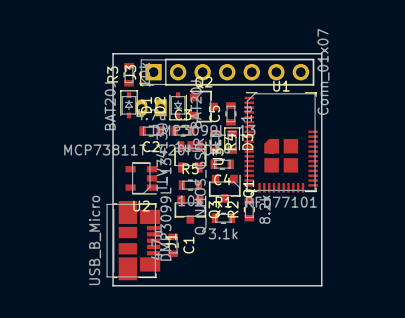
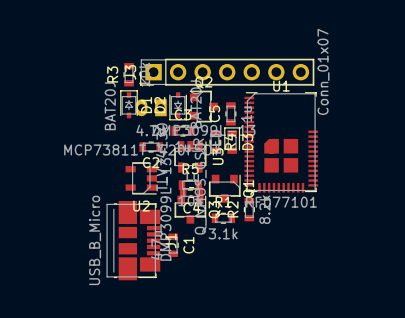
board edge: (113, 53) (321, 53) (321, 285) (113, 285) (113, 53) -> none
C2 position: (151, 131) -> (151, 147)
C4 position: (222, 164) -> (191, 192)

